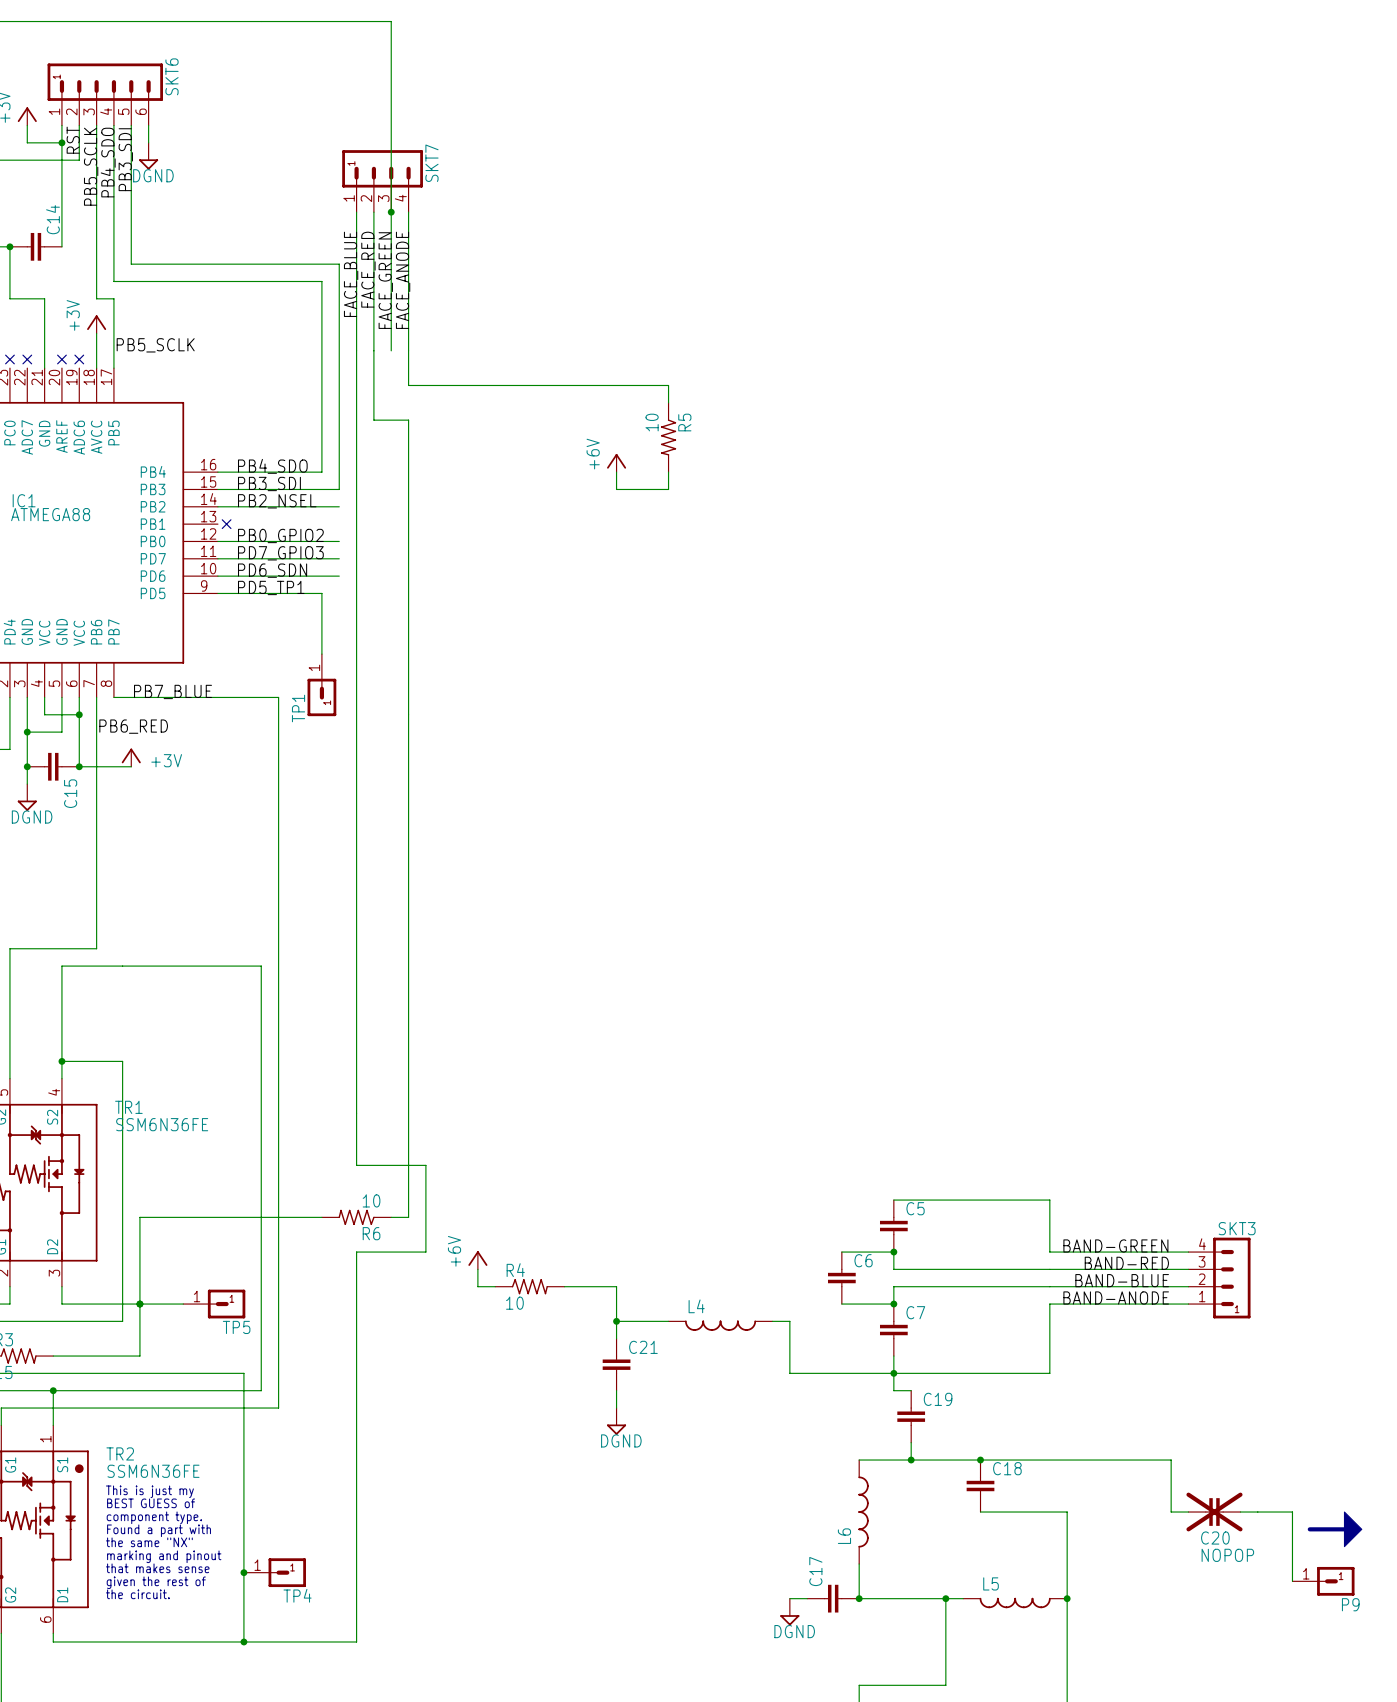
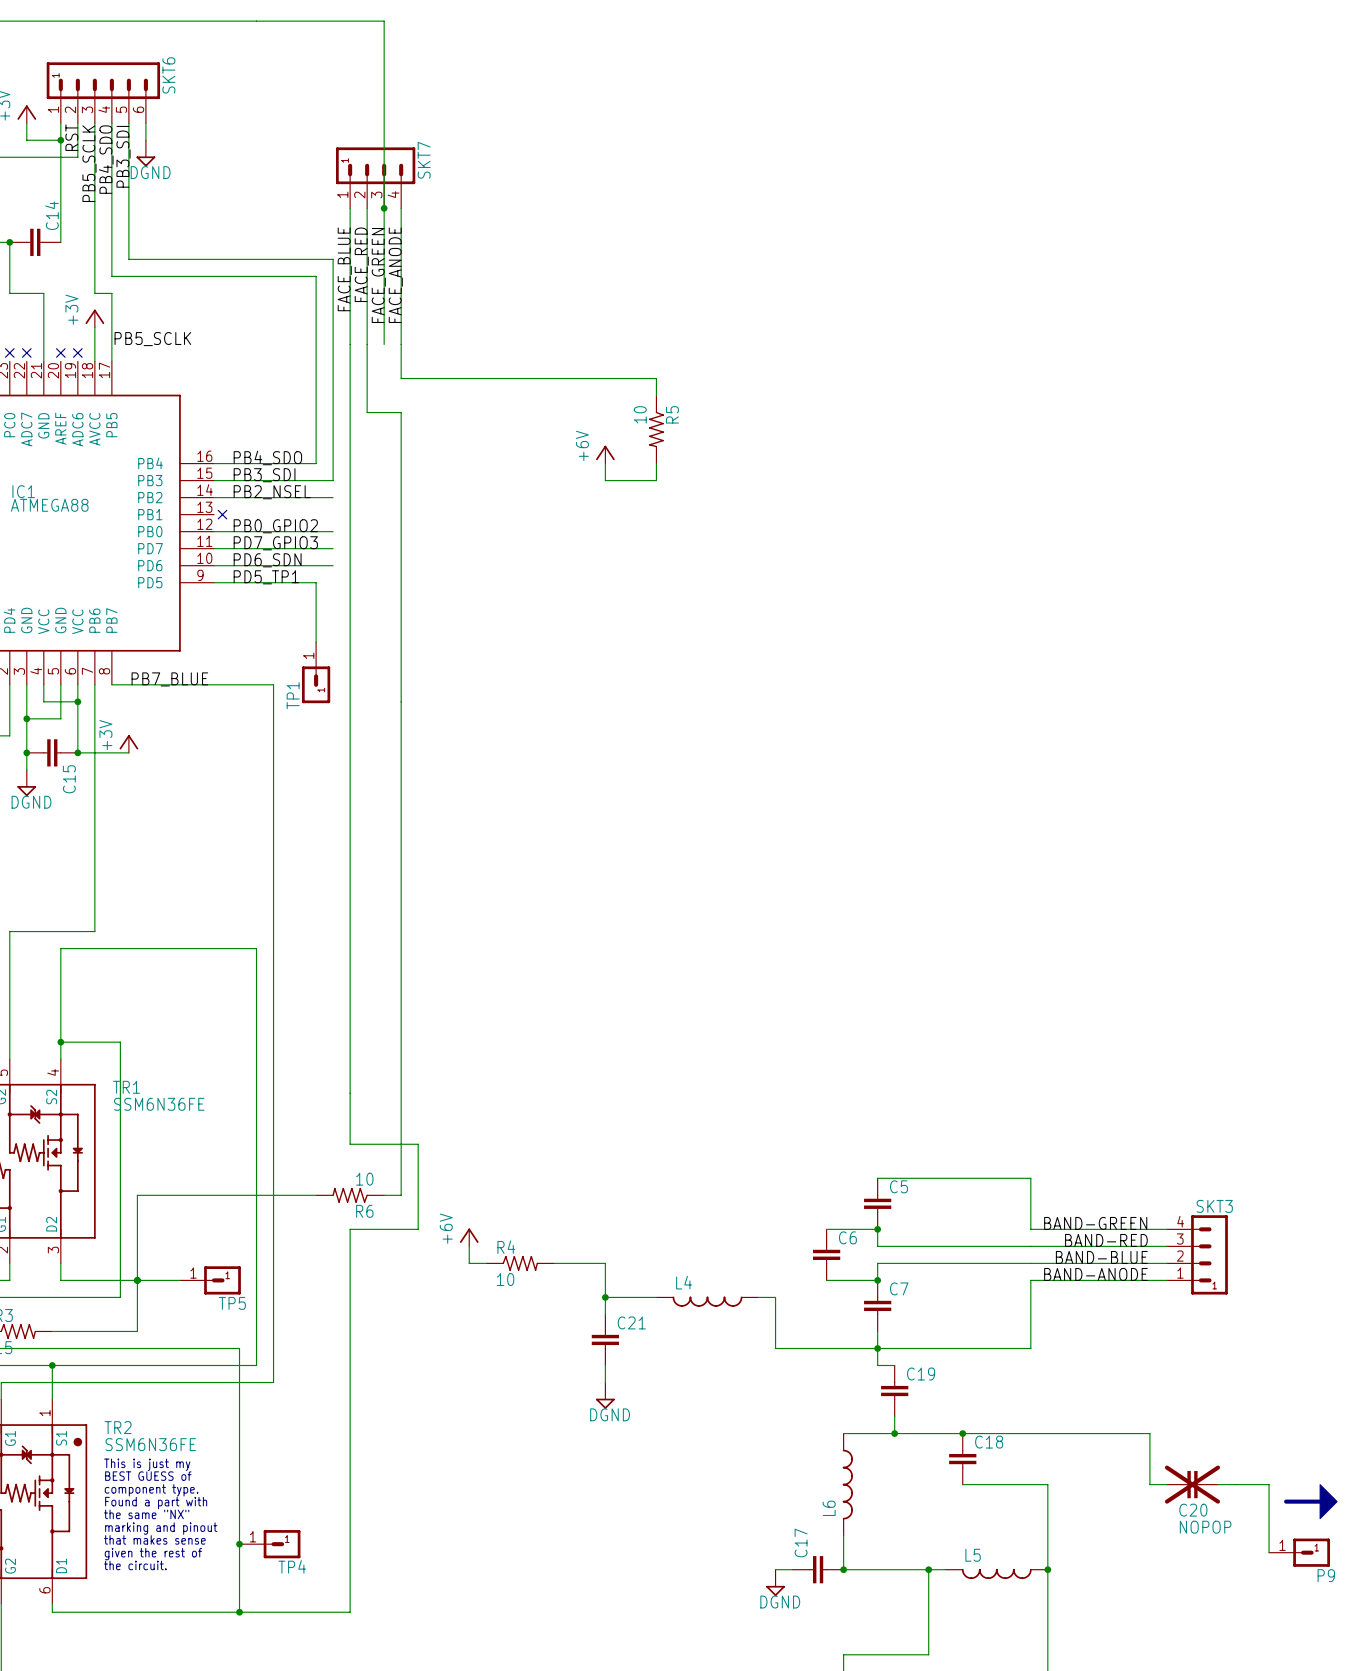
label: PB6_RED (133, 726) -> none
power symbol text rotation: 0° (166, 760) -> 90° counterclockwise (105, 735)
power symbol text position: +3V (166, 760) -> +3V (105, 735)

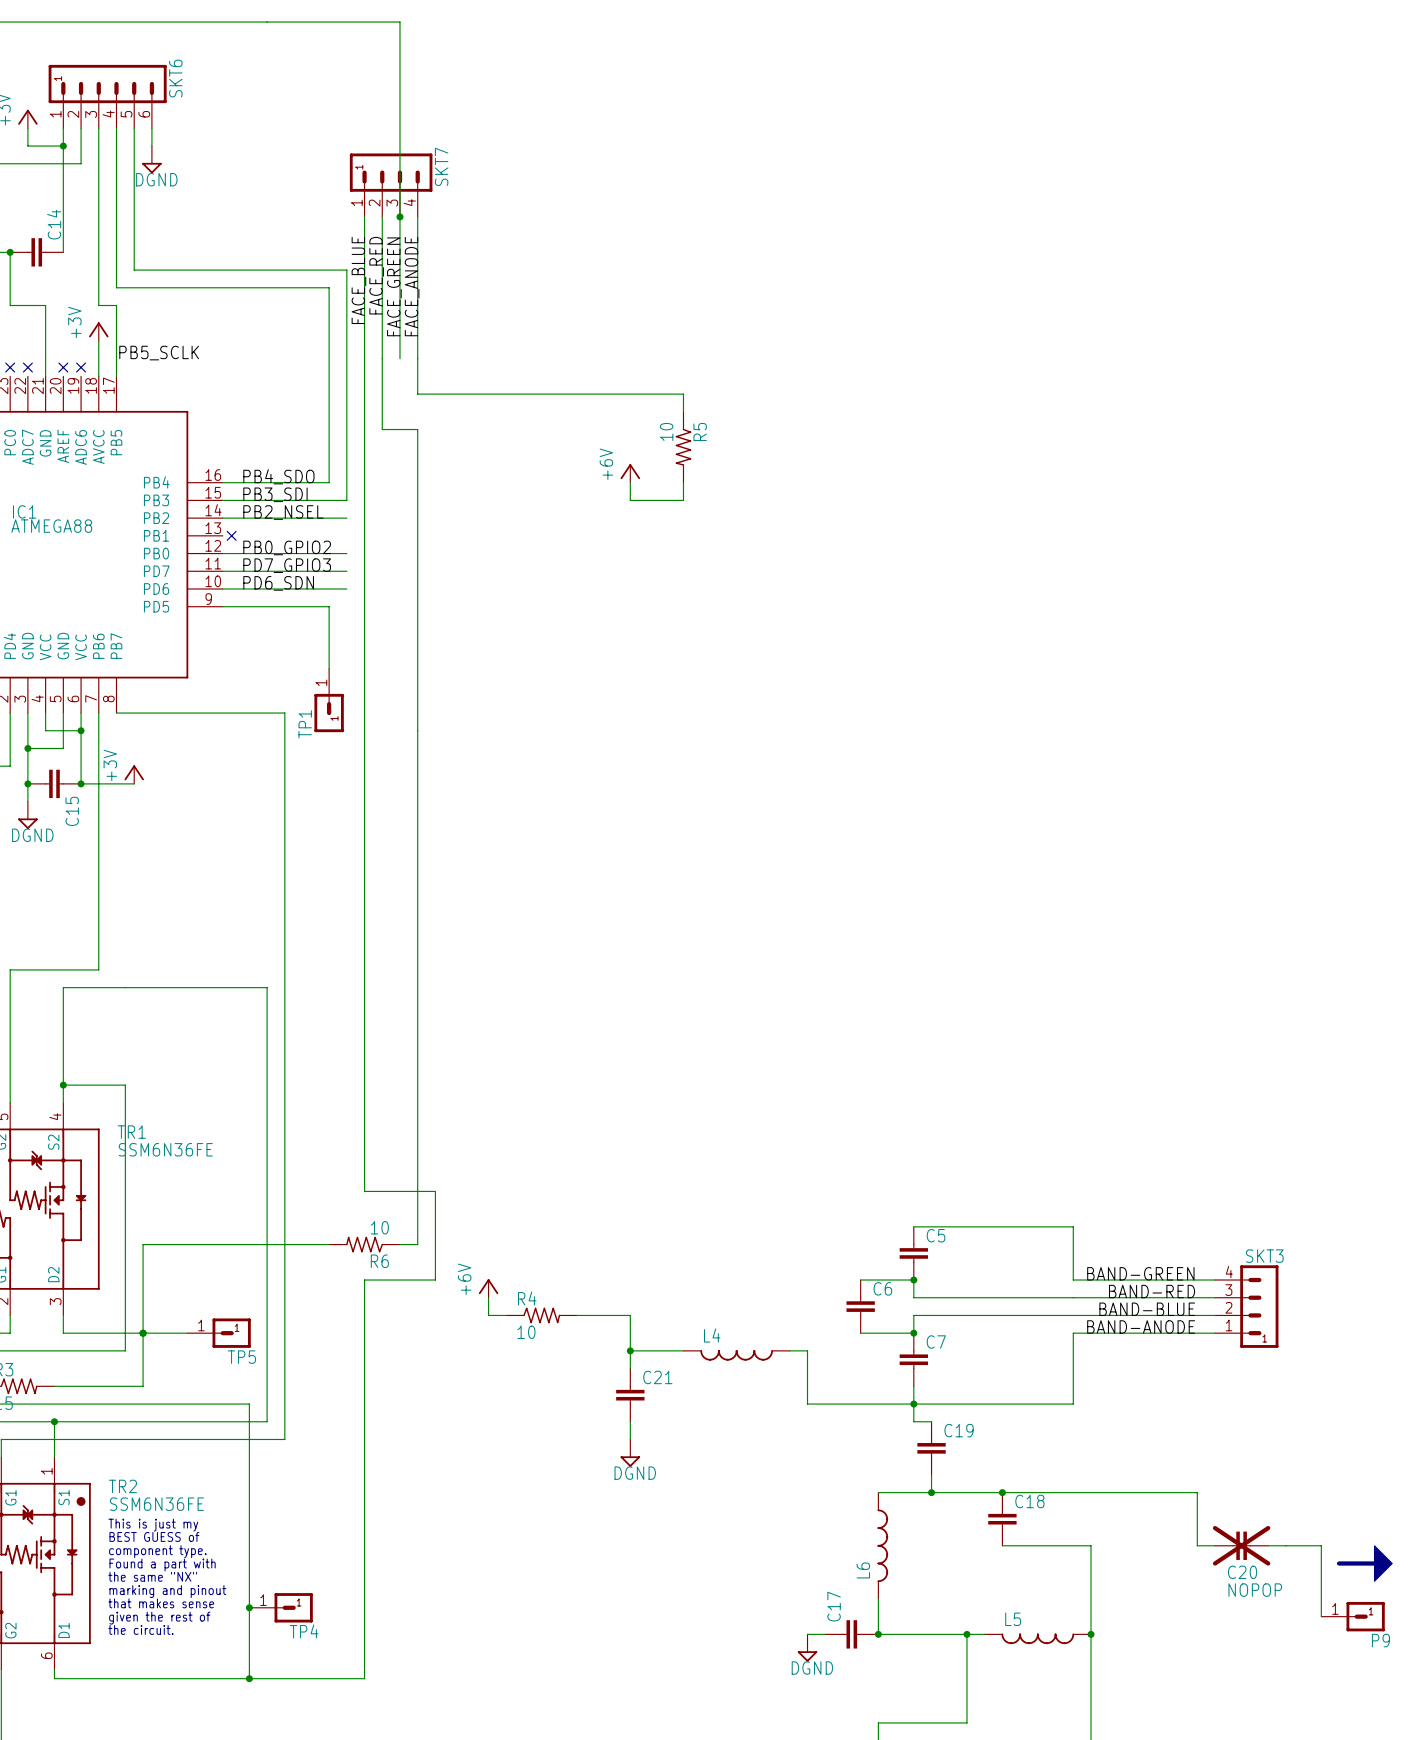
label: RST (71, 137) -> none
label: PB3_SDI (123, 156) -> none
label: PB4_SDO (106, 159) -> none
label: PB5_SCLK (89, 163) -> none
label: PD5_TP1 (266, 577) -> none
label: PB7_BLUE (169, 679) -> none

